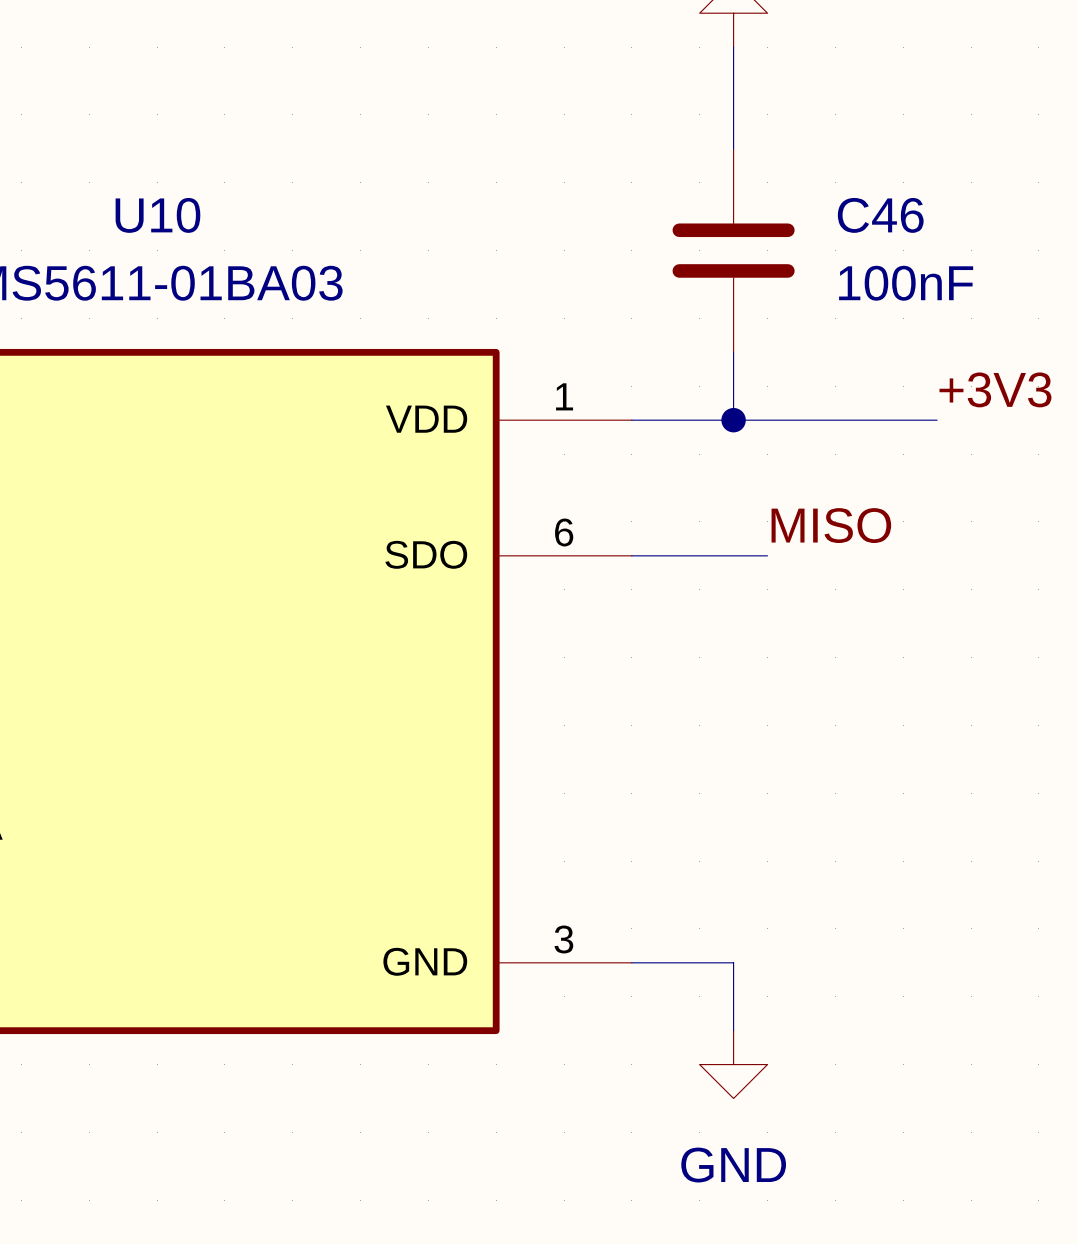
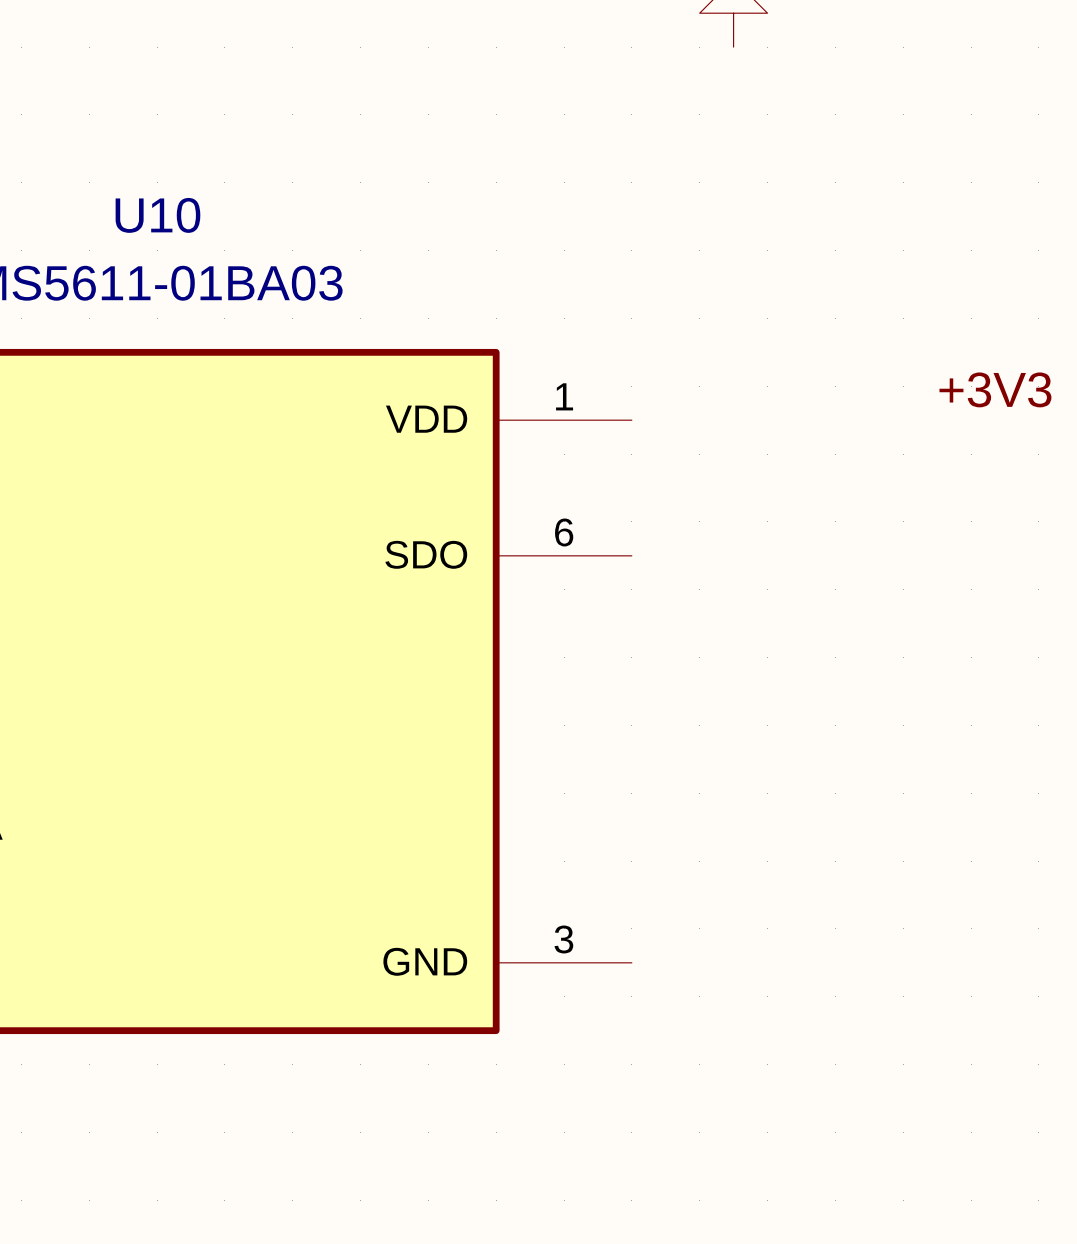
wire: (733, 47) (733, 148) -> none
C46: 100nF (733, 250) -> none
wire: (733, 352) (733, 420) -> none
wire: (631, 420) (937, 420) -> none
junction: (733, 420) -> none
label: MISO (831, 525) -> none
wire: (631, 555) (767, 555) -> none
wire: (631, 962) (733, 962) (733, 1030) -> none
power symbol: GND (733, 1064) -> none

